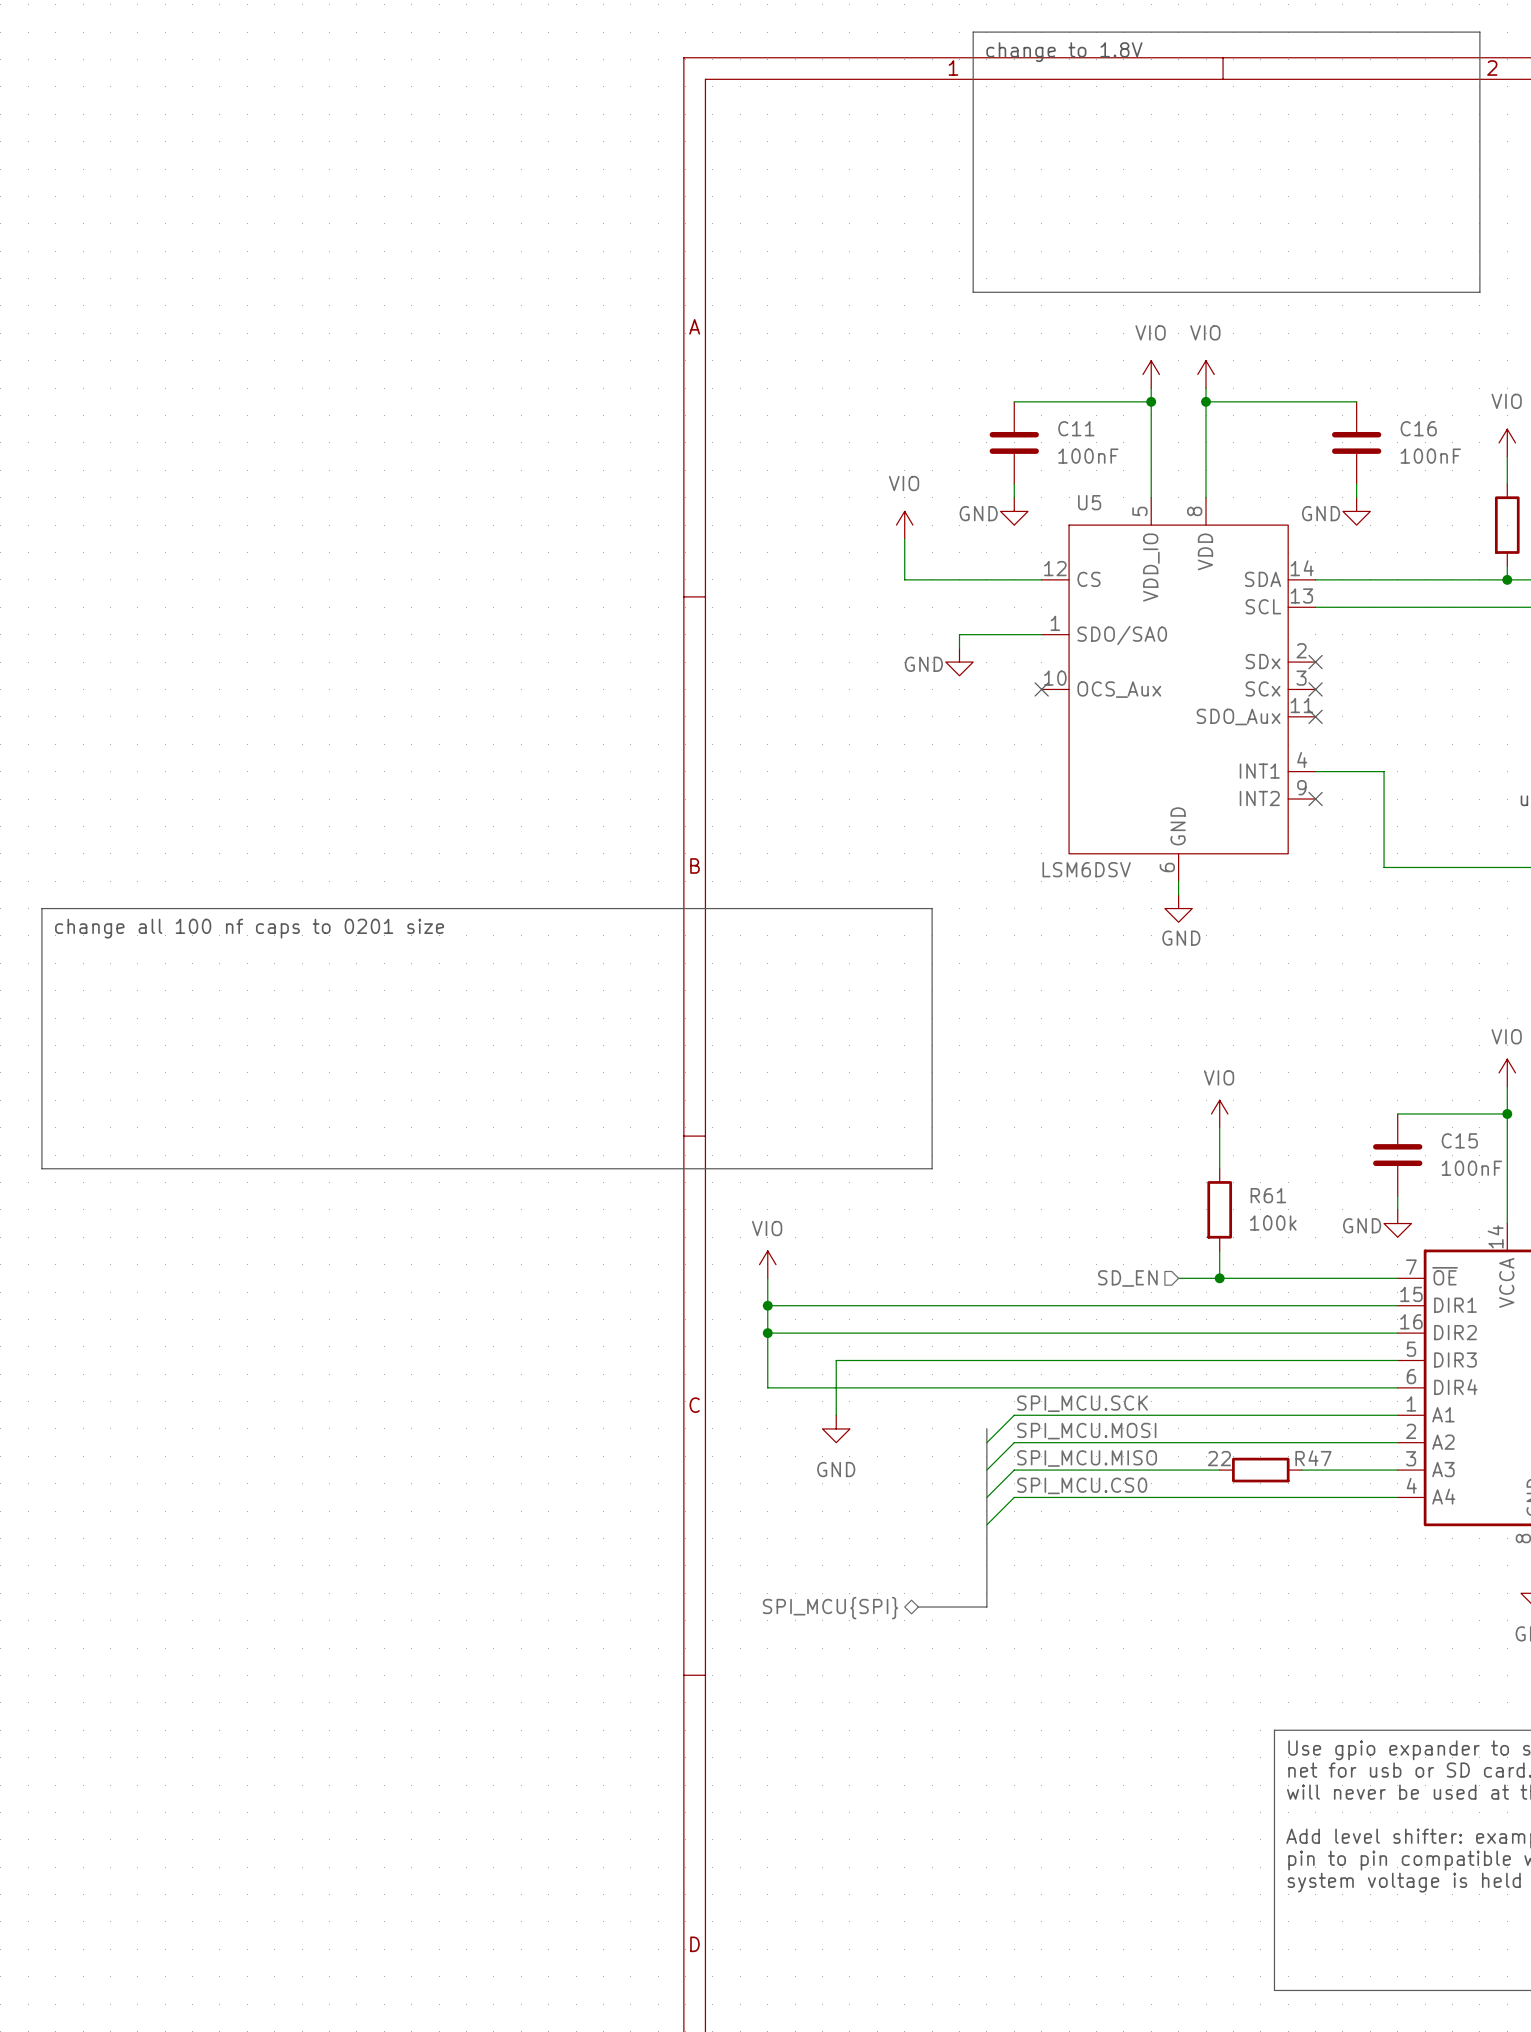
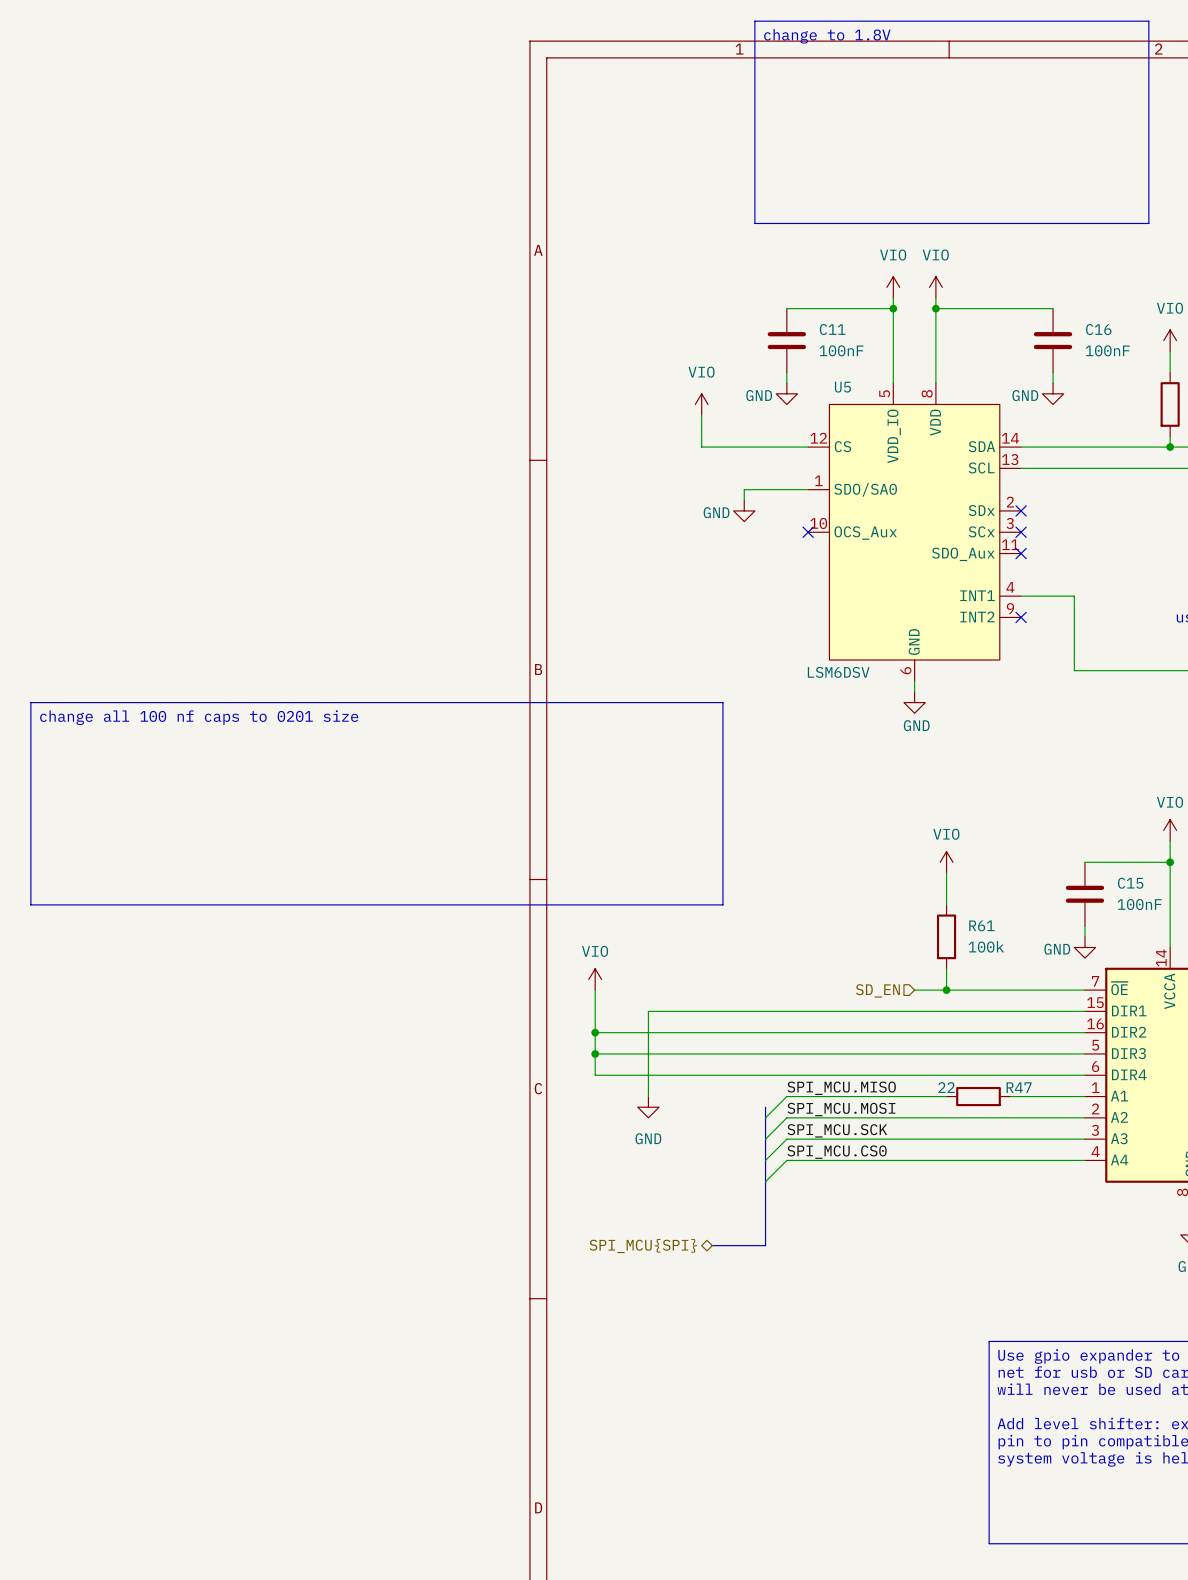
wire: (767, 1305) (836, 1305) -> (595, 1053) (648, 1053) (648, 1011)
junction position: (767, 1305) -> (595, 1053)
label: SPI_MCU.SCK (1082, 1403) -> SPI_MCU.MISO (841, 1088)
wire: (1219, 1415) (1301, 1415) -> (946, 1139) (1010, 1139)
label: SPI_MCU.MISO (1087, 1458) -> SPI_MCU.SCK (837, 1130)
R47 position: (1260, 1470) -> (978, 1096)

